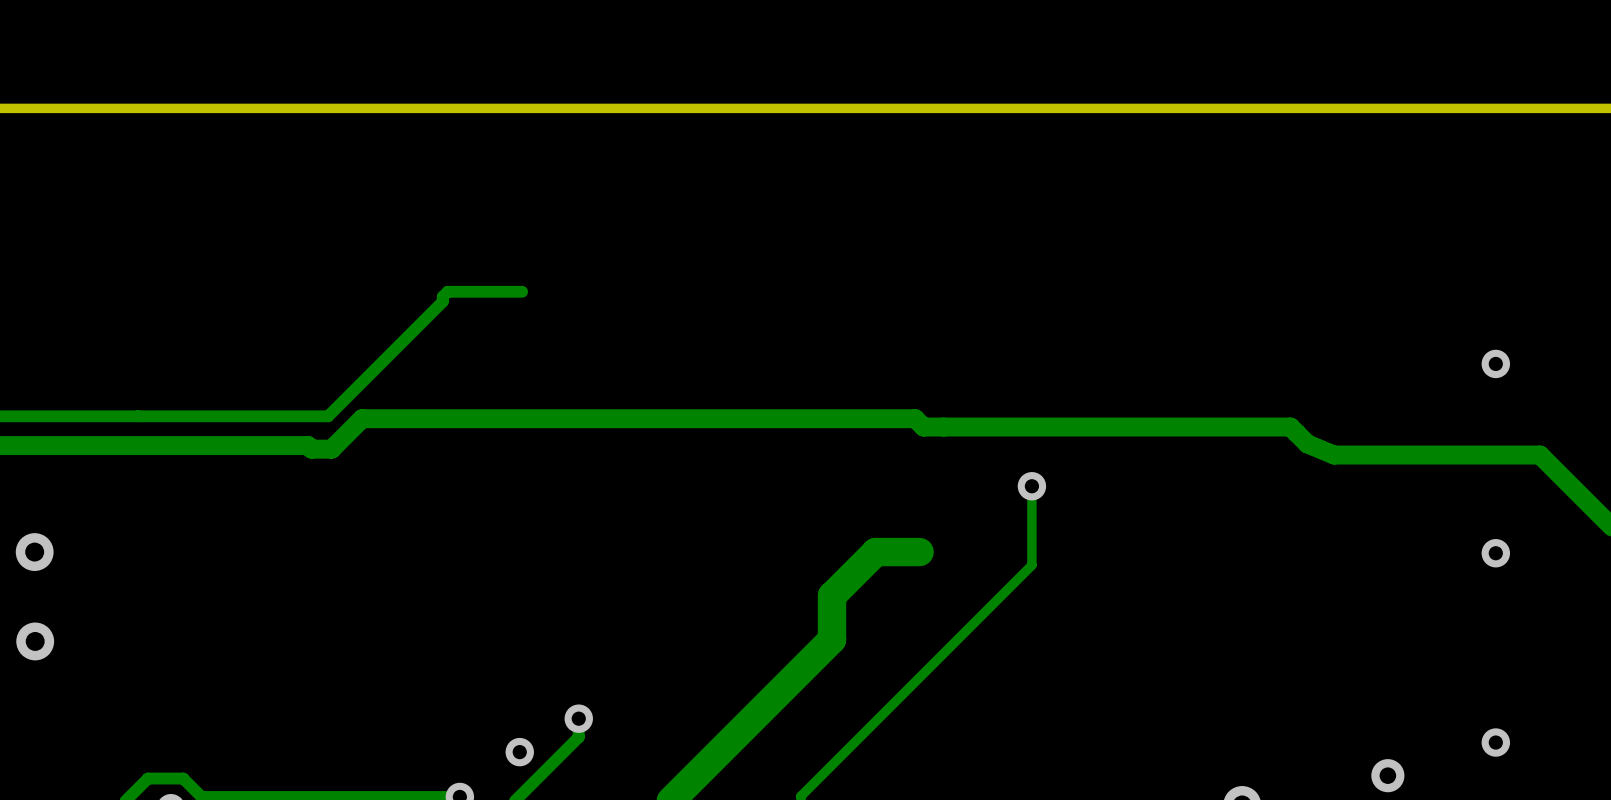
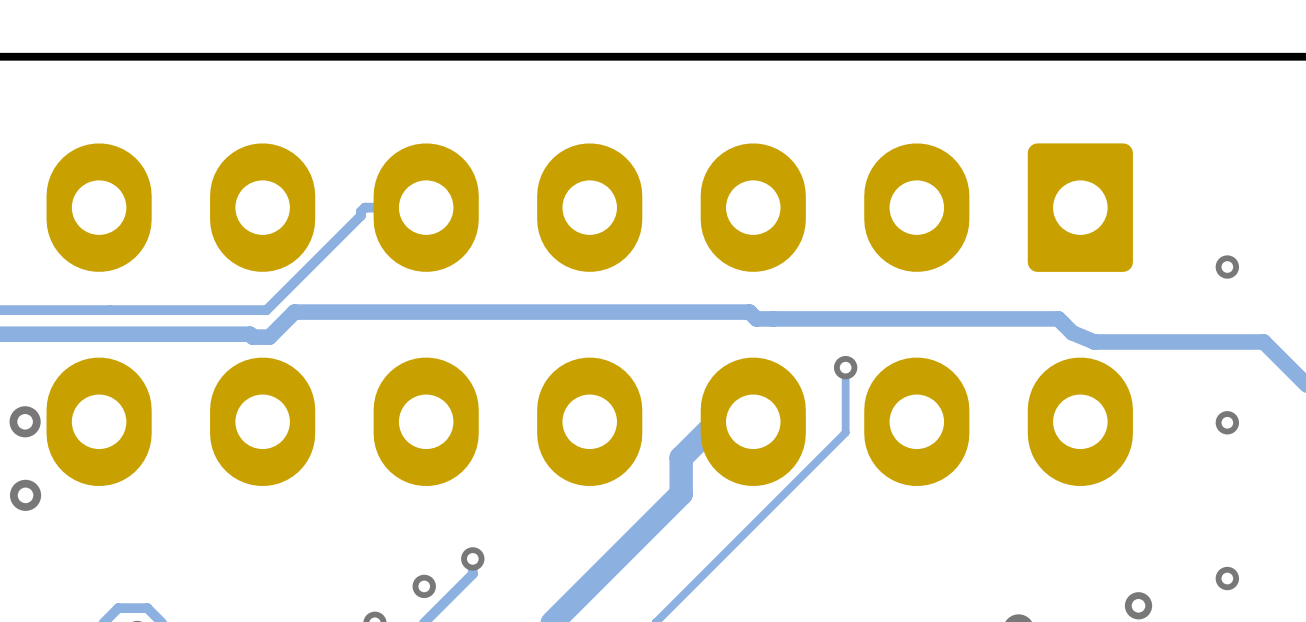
part: none -> (589, 314)

